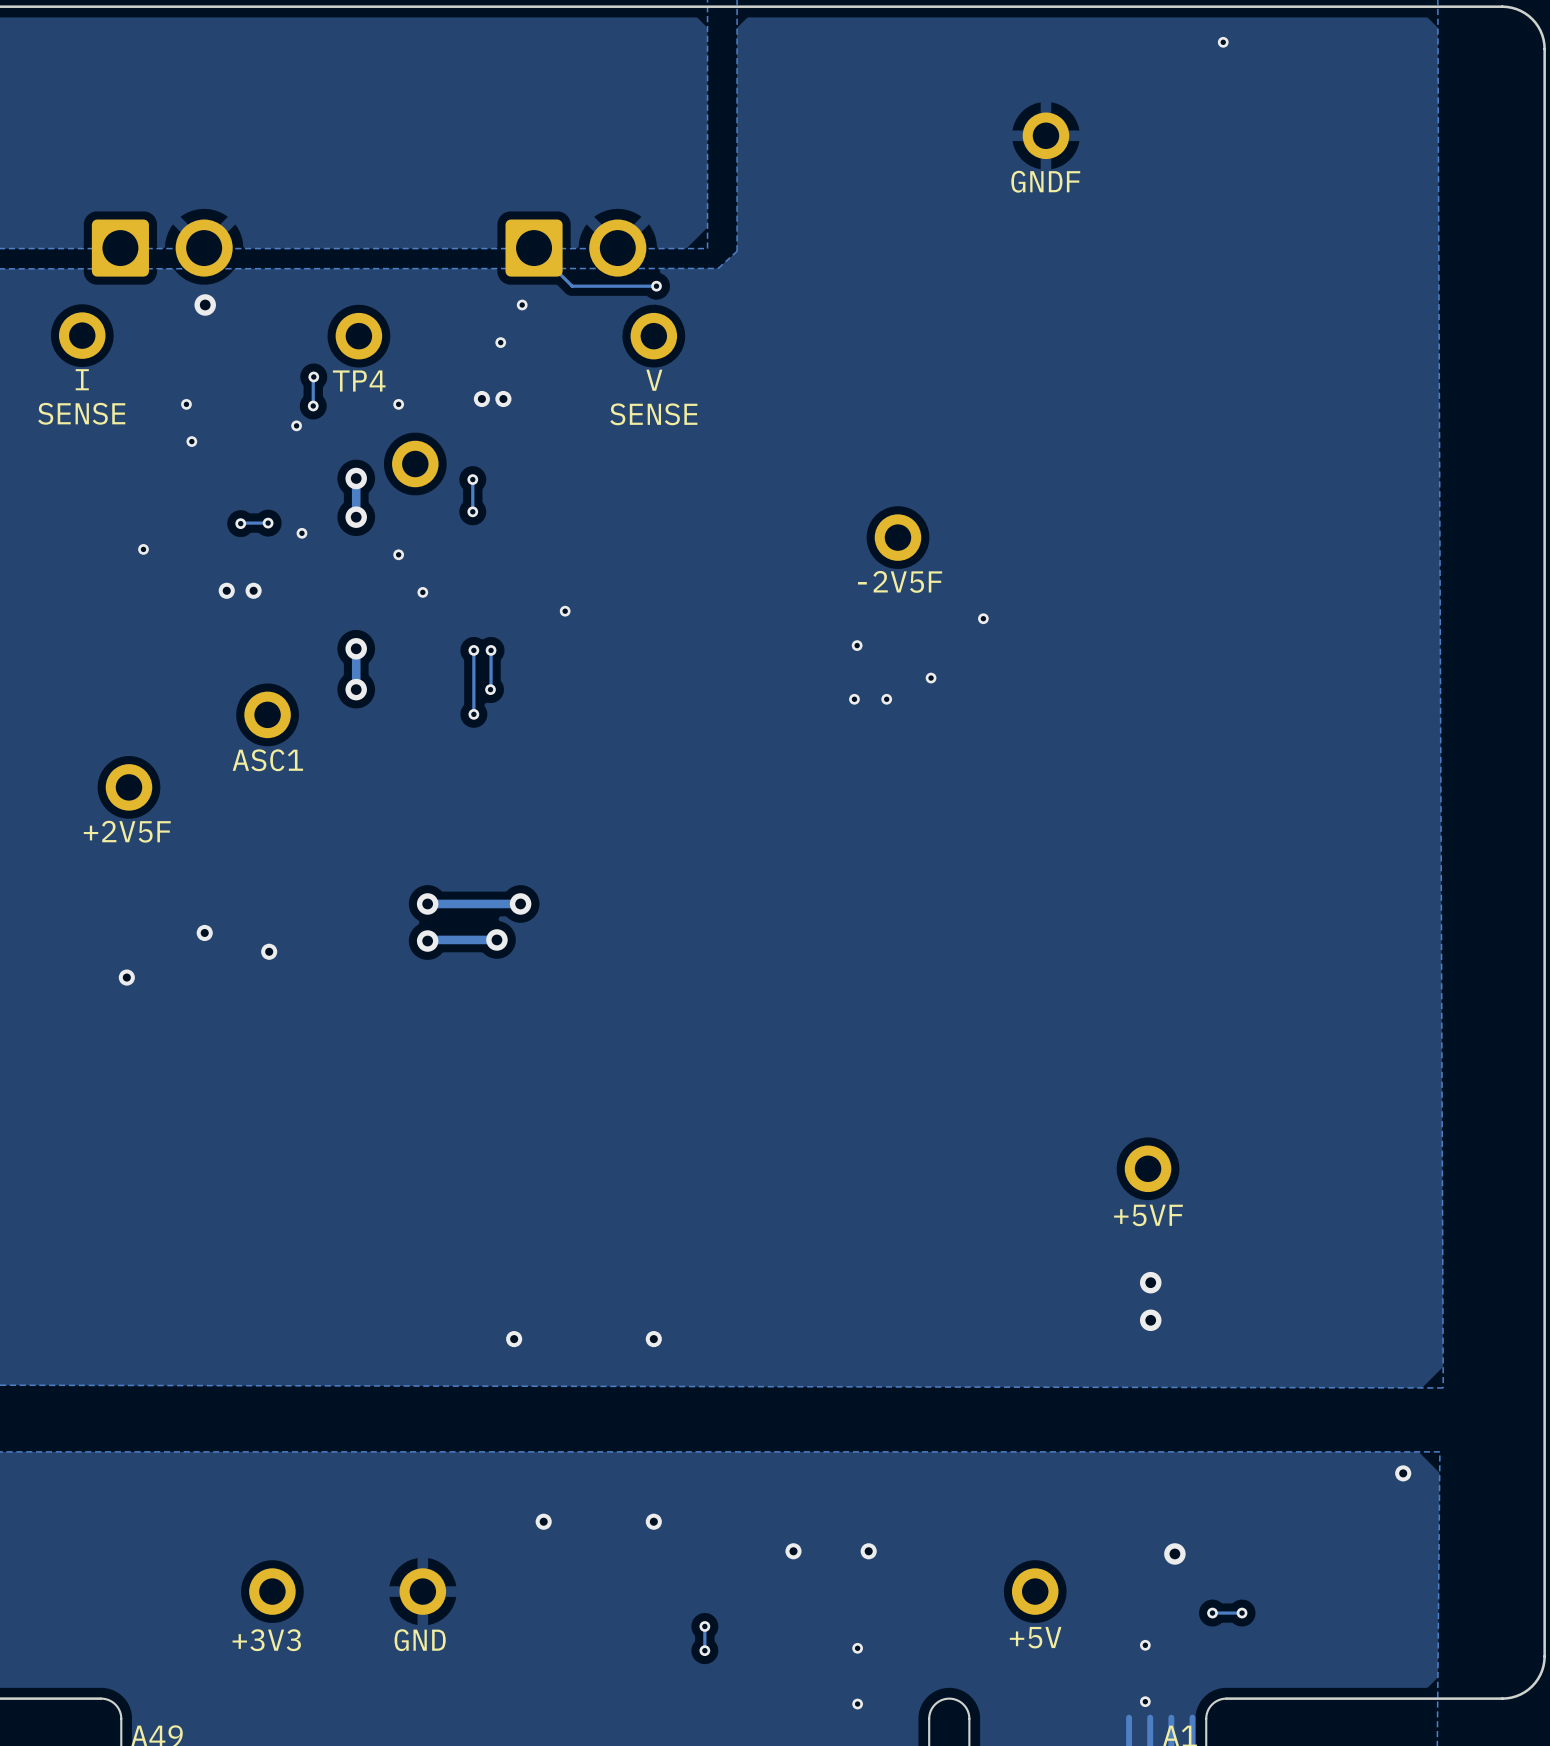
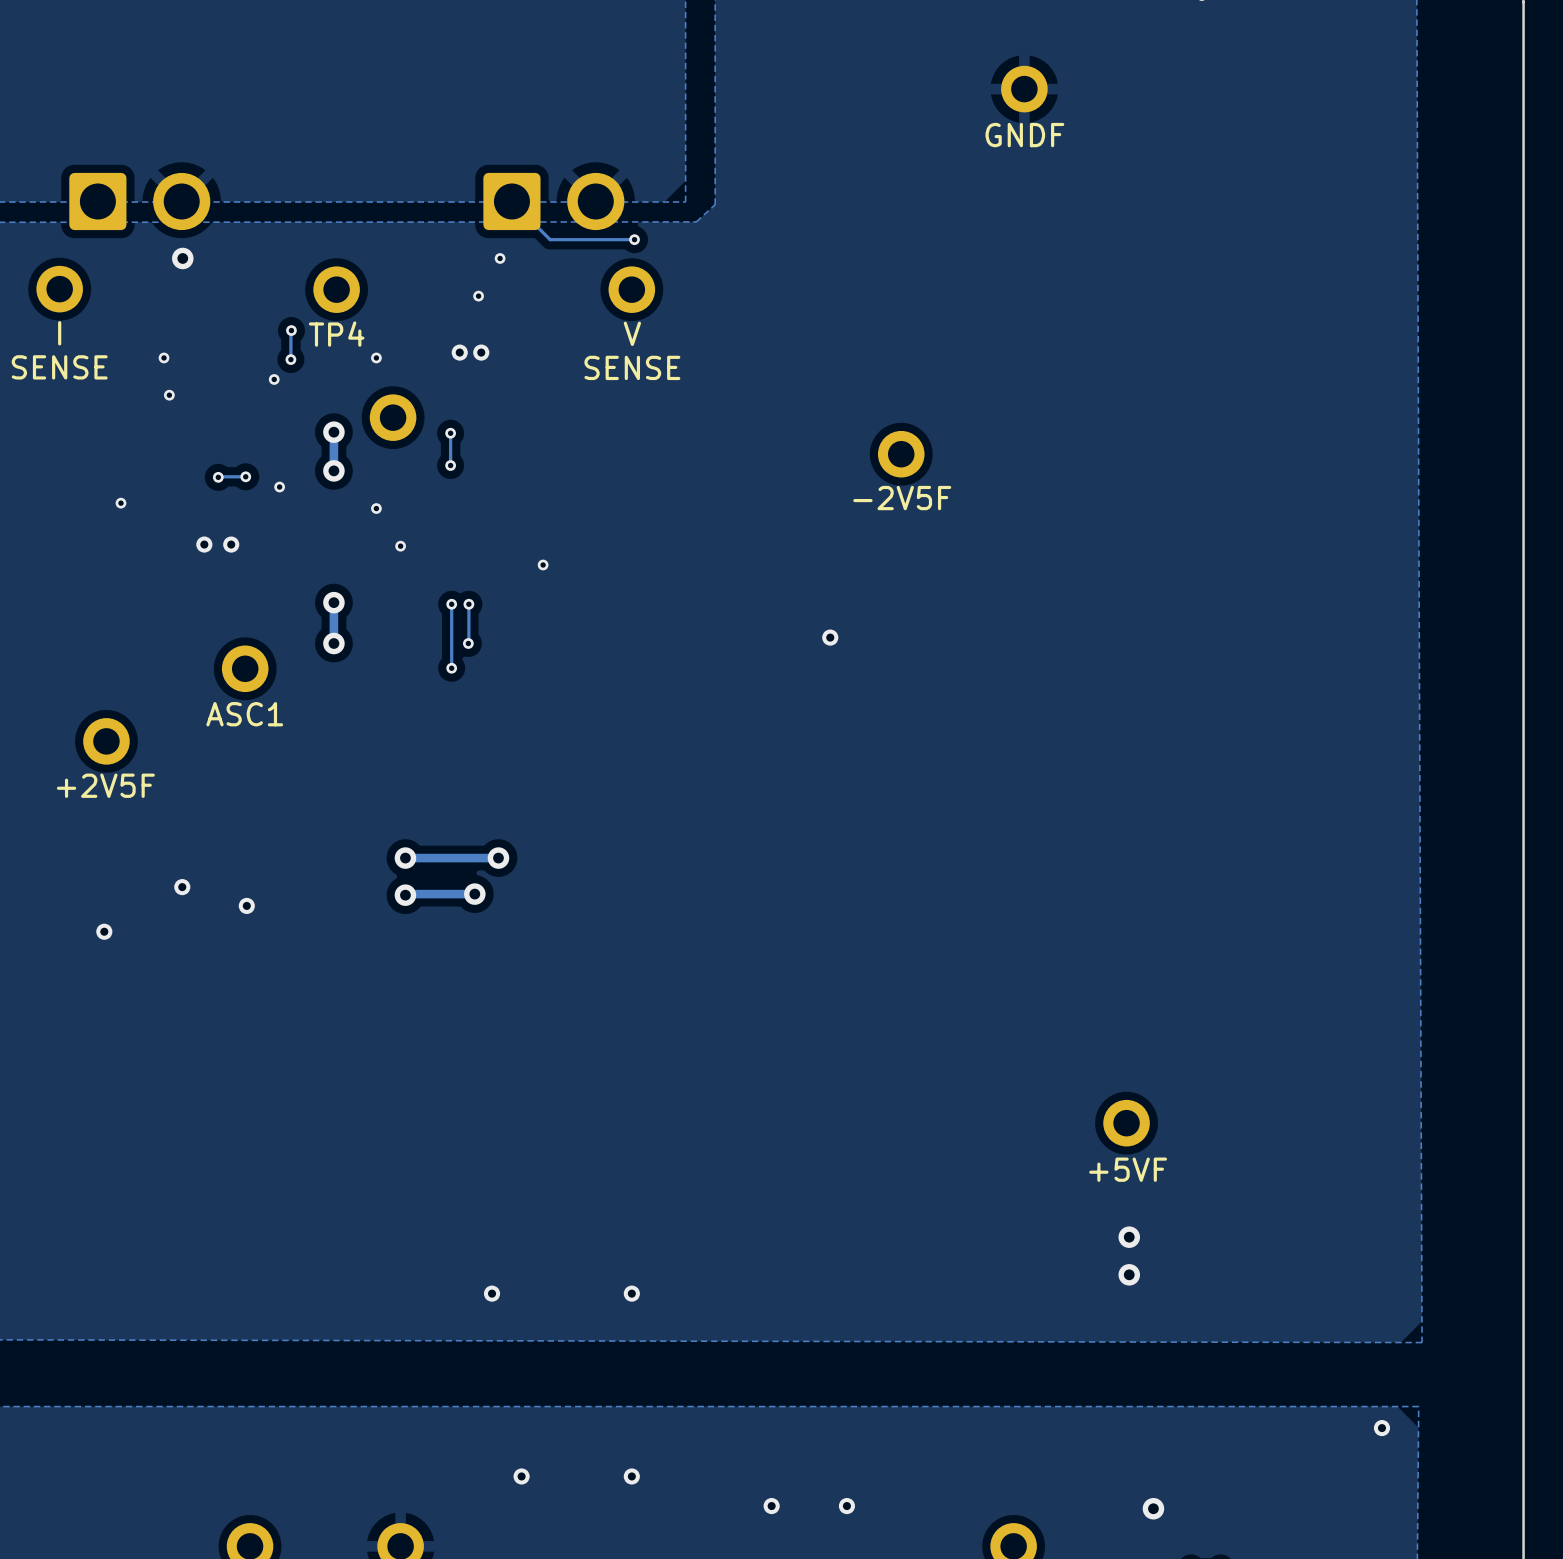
part position: (897, 537) -> (901, 454)
text position: -2V5F (900, 581) -> -2V5F (902, 498)
via: (983, 618) -> none
via: (857, 645) -> none
via: (931, 678) -> none
via: none -> (830, 637)
via: (854, 699) -> none
via: (886, 699) -> none

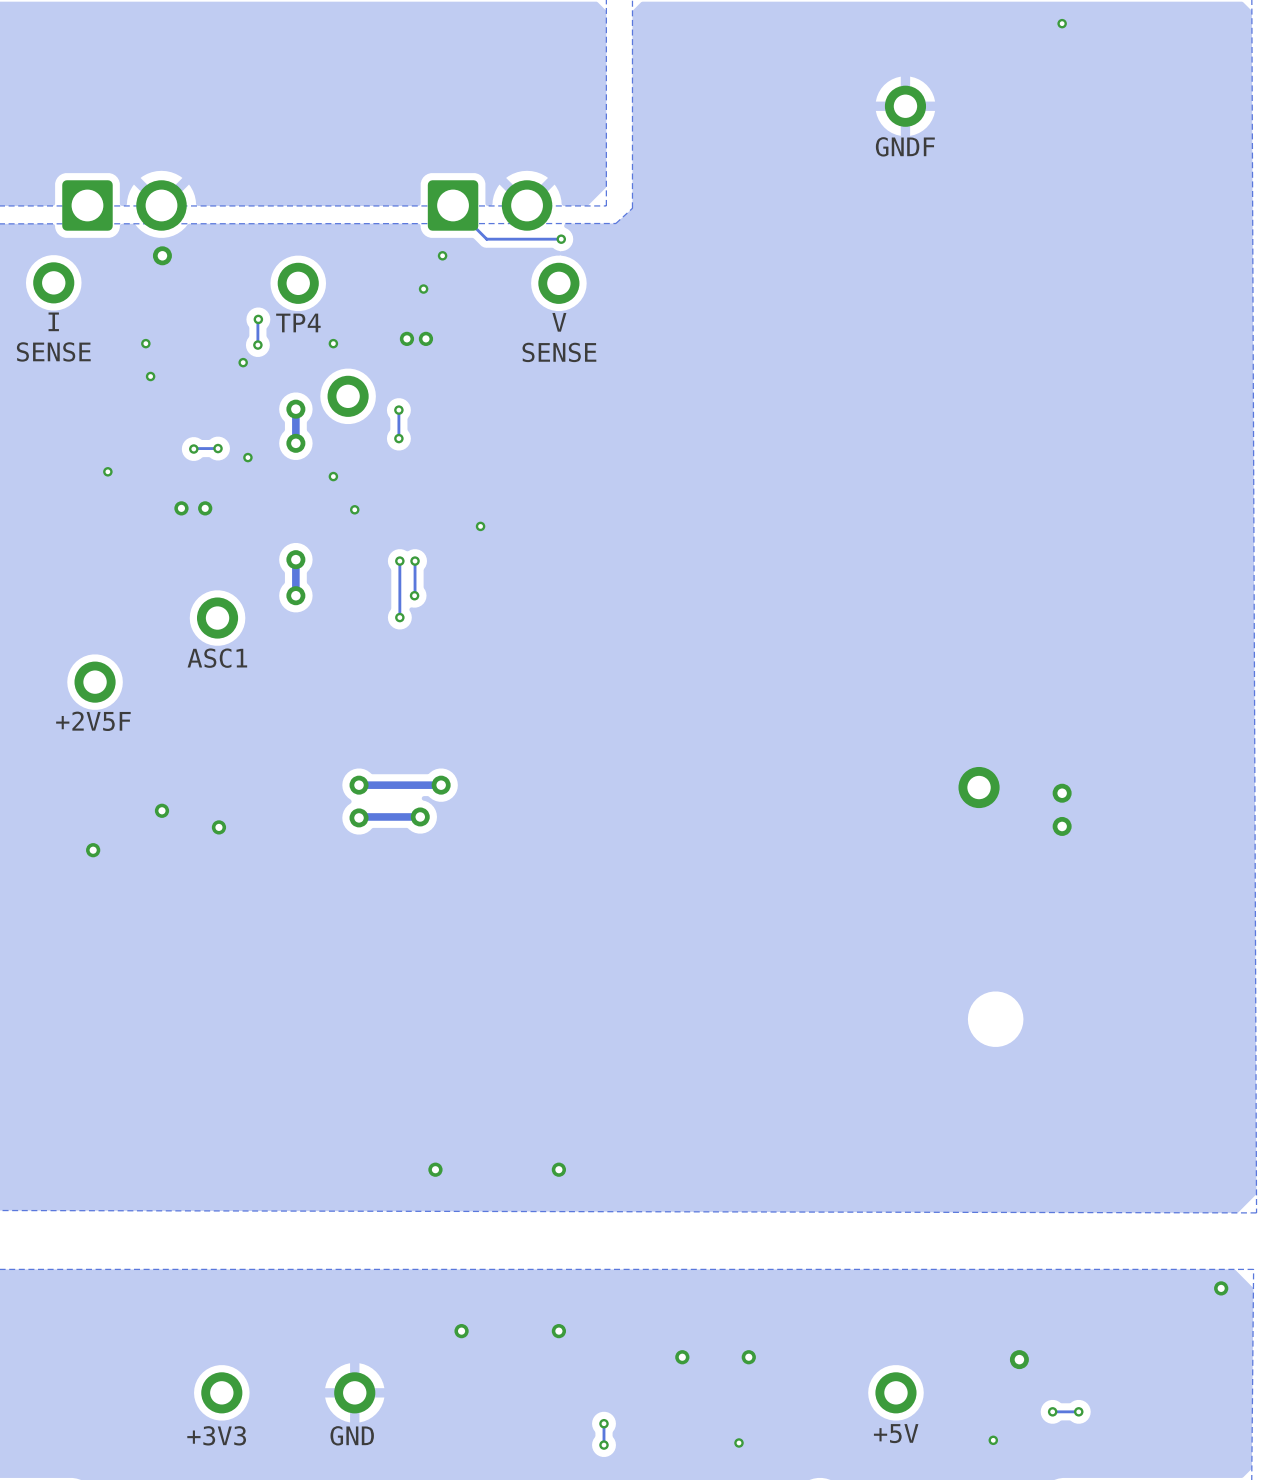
part: (901, 454) -> none
text: -2V5F (902, 498) -> none
via: (830, 637) -> none
part: none -> (979, 787)
via: none -> (1062, 793)
via: none -> (1062, 826)
part: (1126, 1123) -> none
text: +5VF (1128, 1169) -> none
via: (1129, 1237) -> none
via: (1129, 1274) -> none

